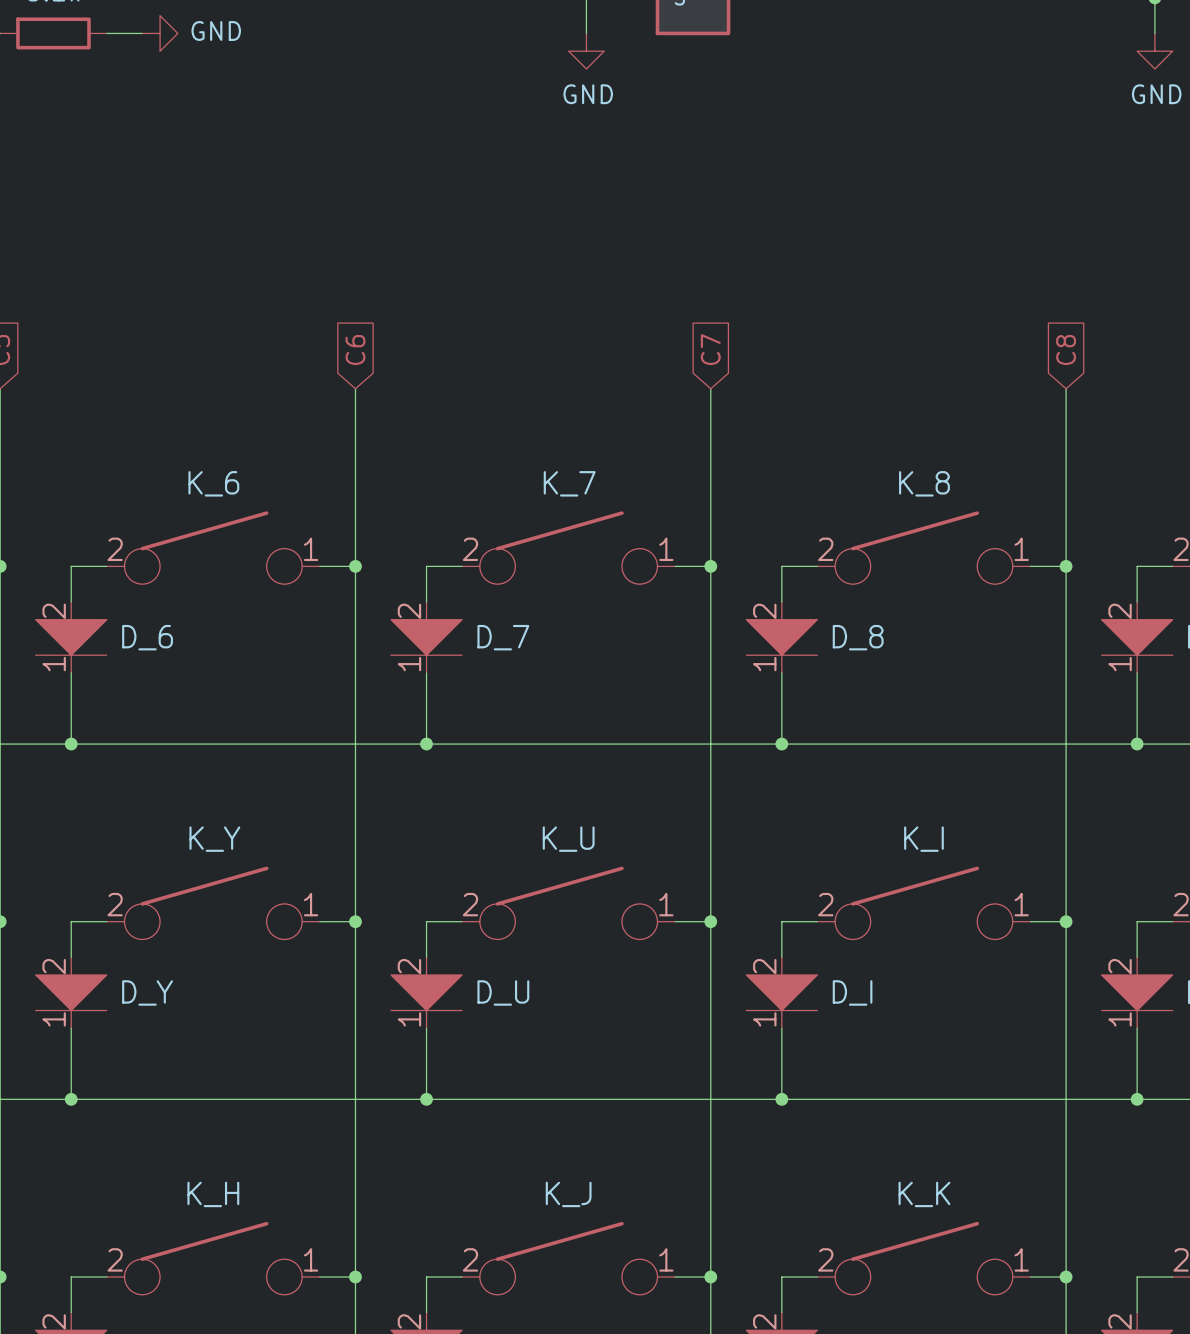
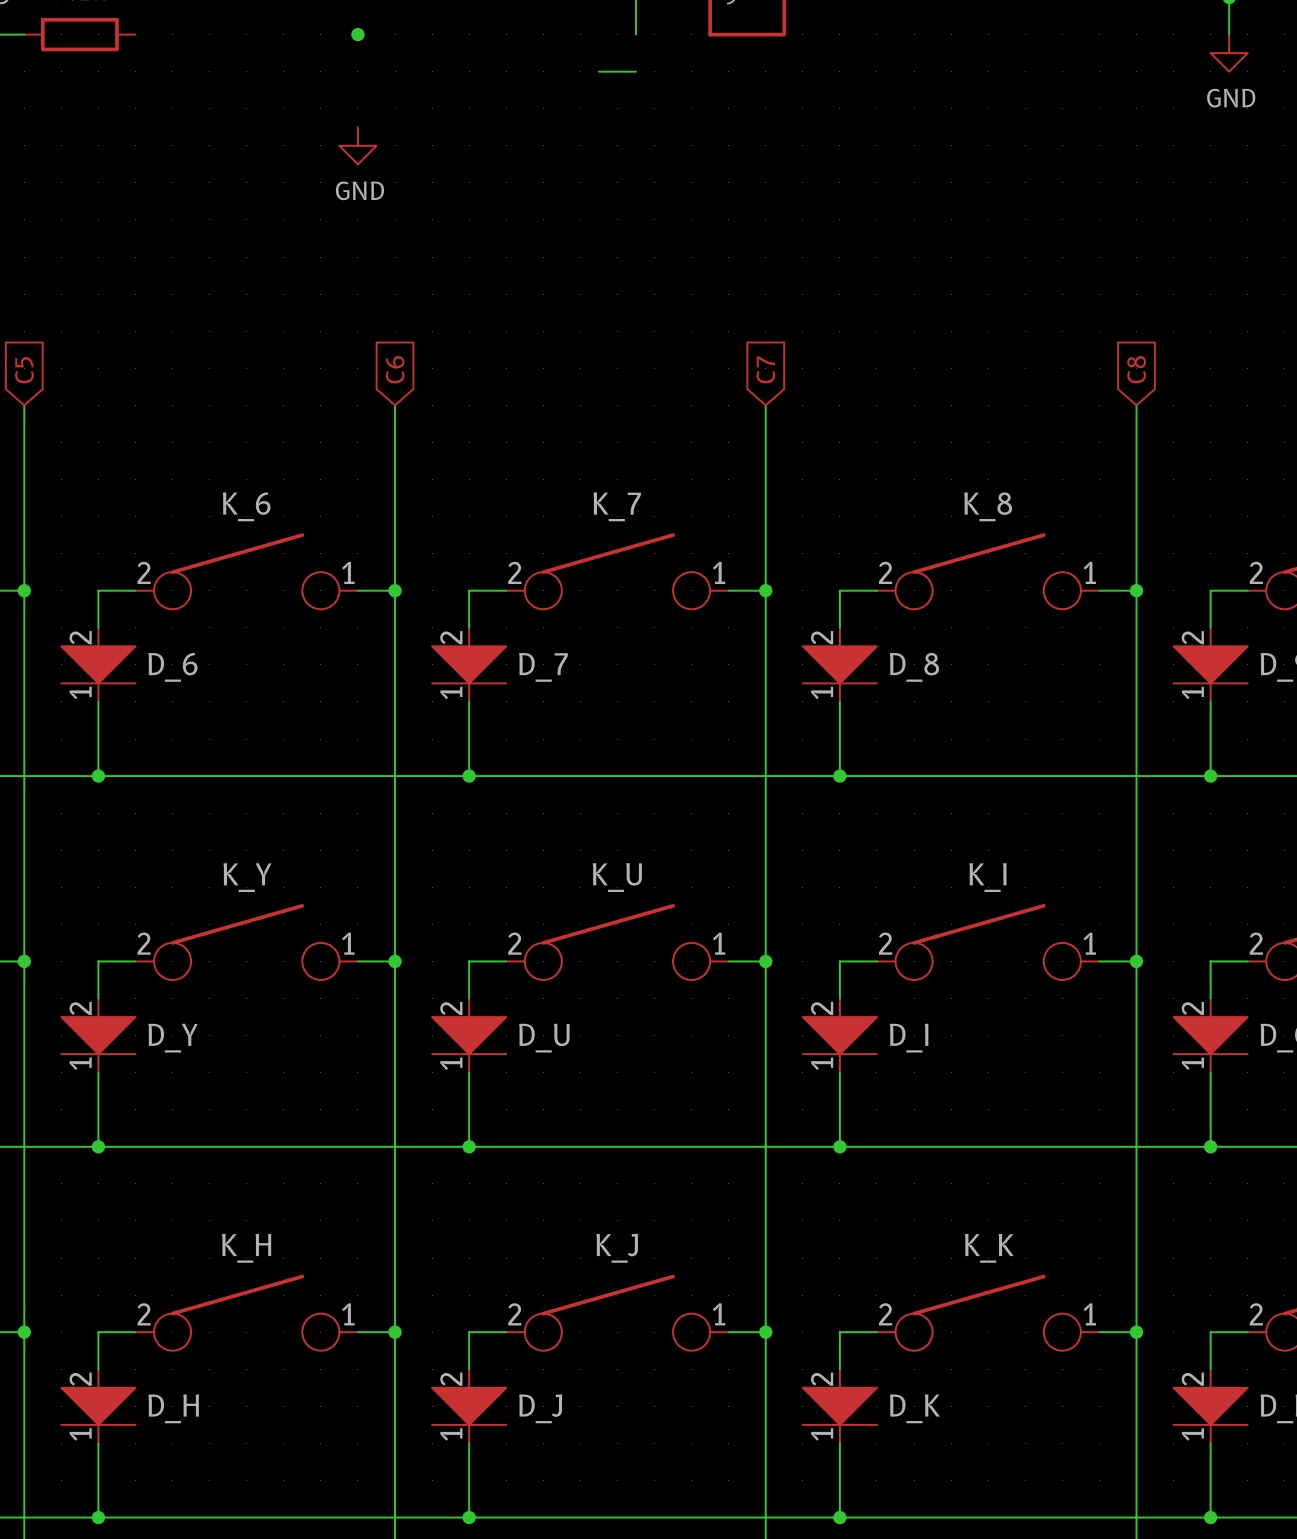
wire: (106, 33) (142, 33) -> none
power symbol: GND (160, 33) -> none
junction: none -> (357, 34)
power symbol: GND (586, 51) -> none
wire: none -> (598, 71) (636, 71)
power symbol: none -> GND (357, 145)

